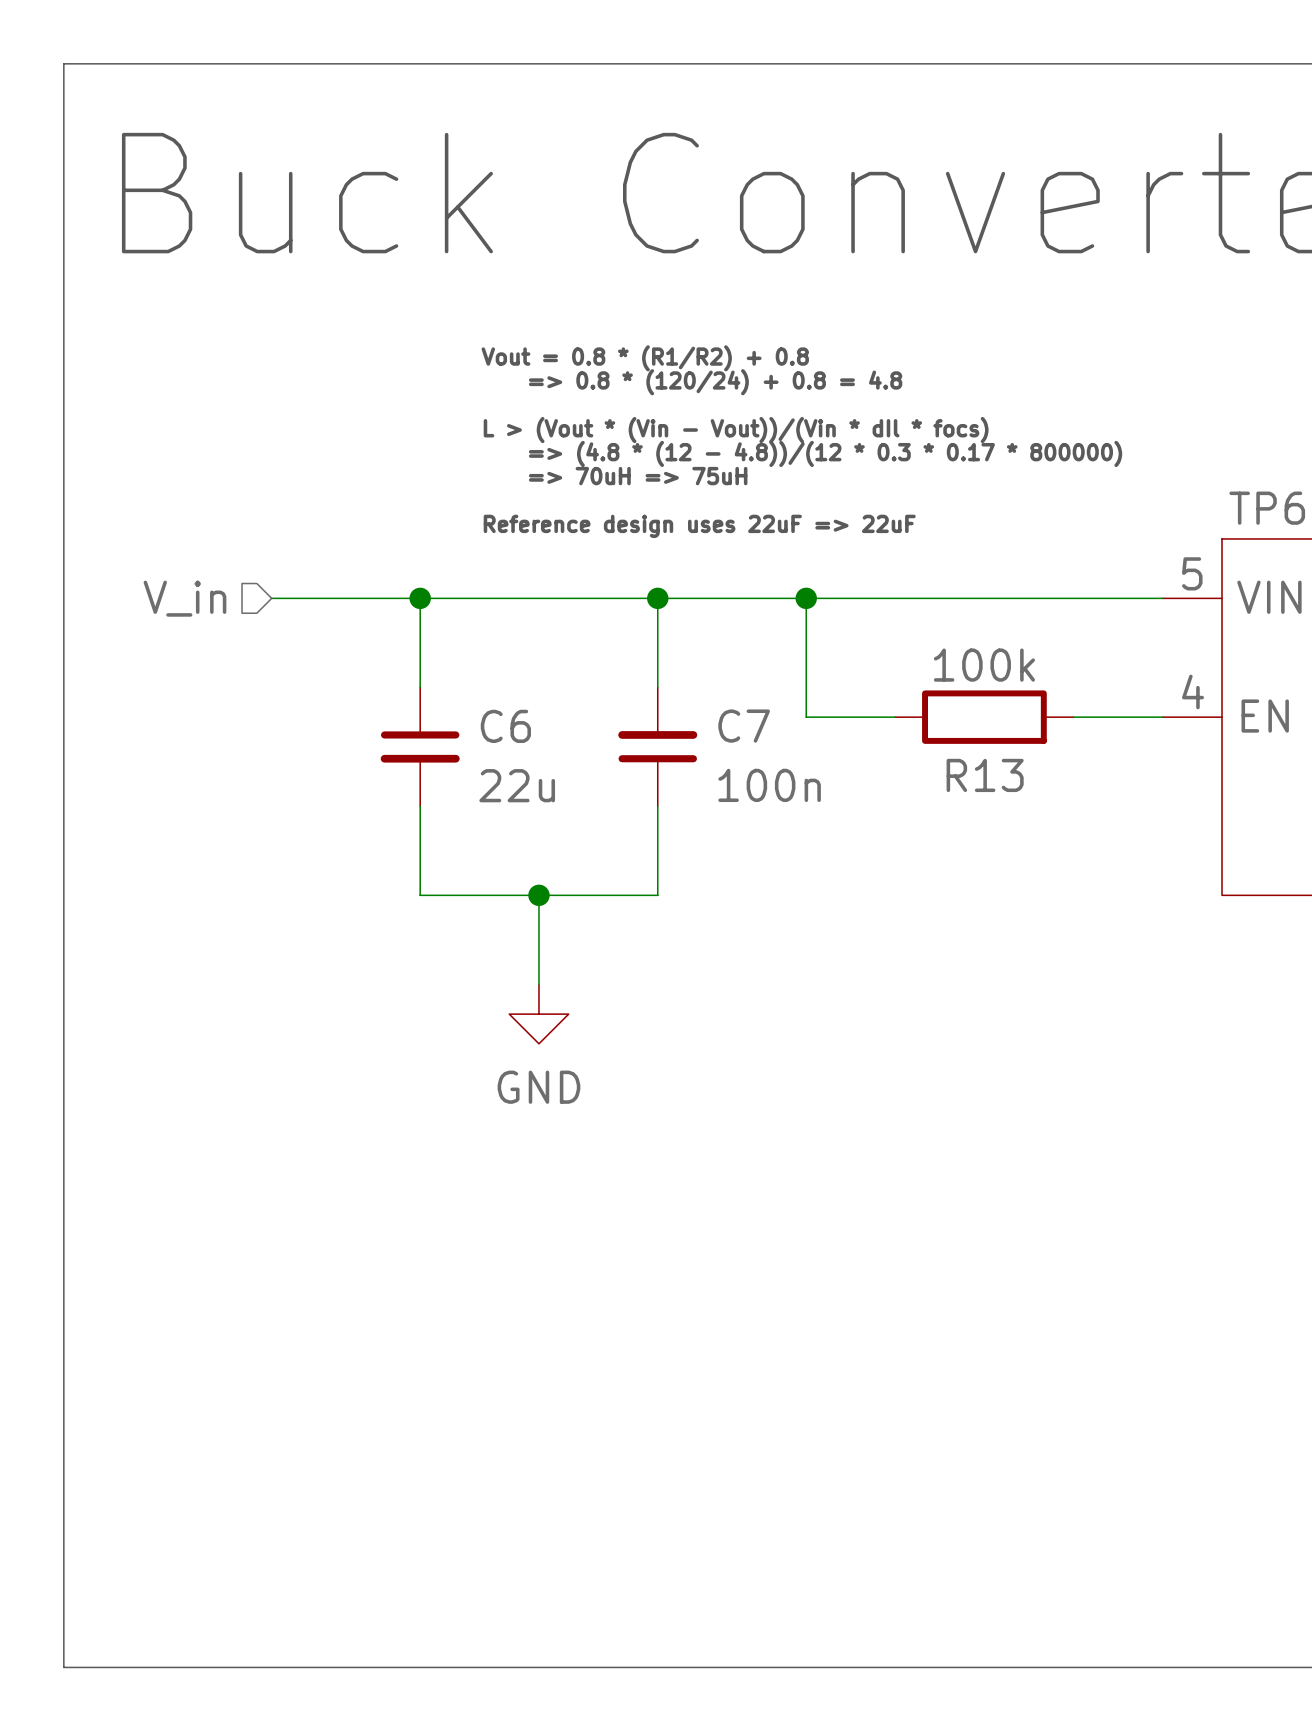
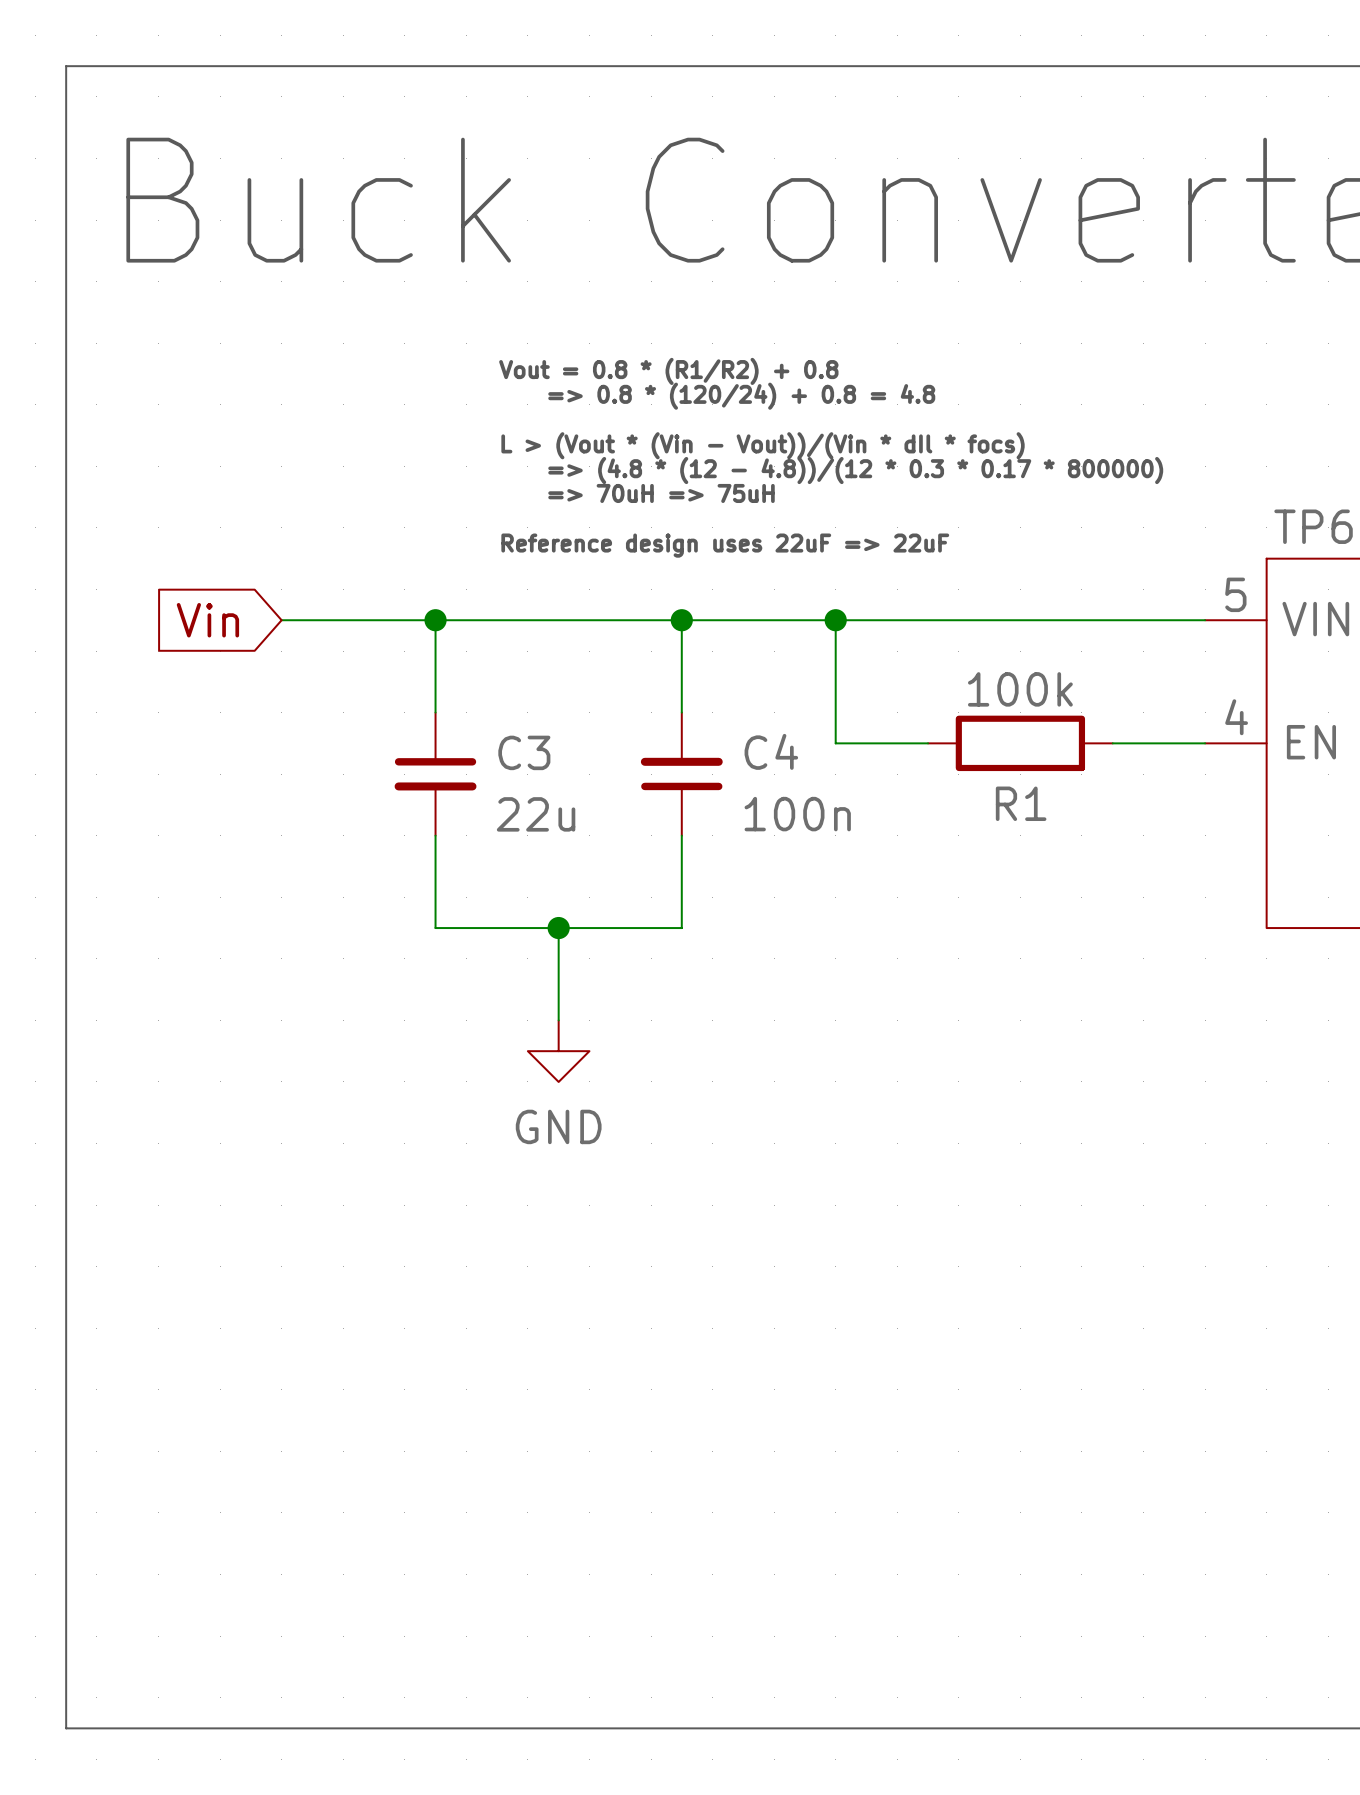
hierarchical label: V_in (184, 598) -> none
global label: none -> Vin (207, 620)
C6 name: C6 (505, 726) -> C3 (524, 752)
C7 name: C7 (744, 726) -> C4 (771, 751)
R13 name: R13 (985, 775) -> R1 (1021, 803)

